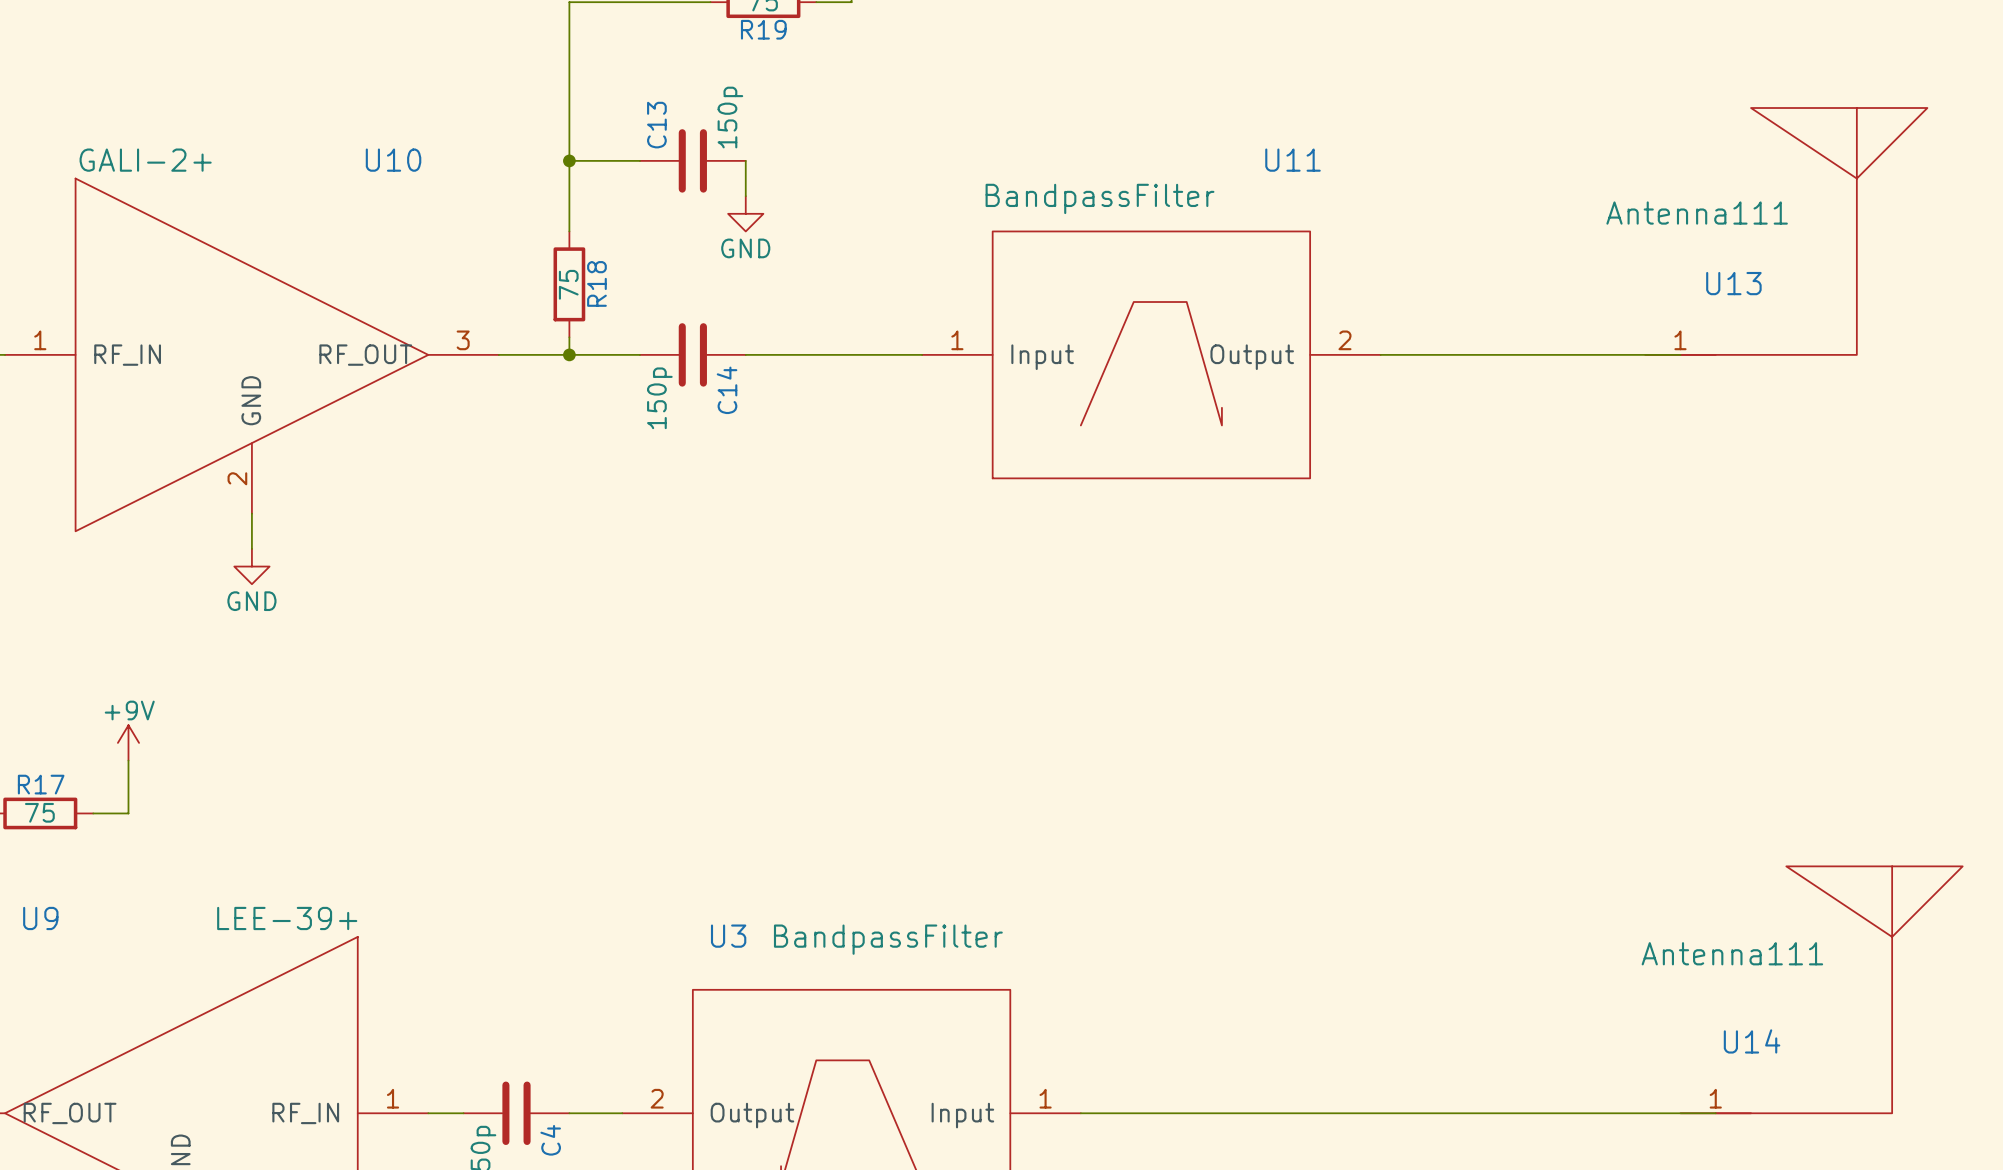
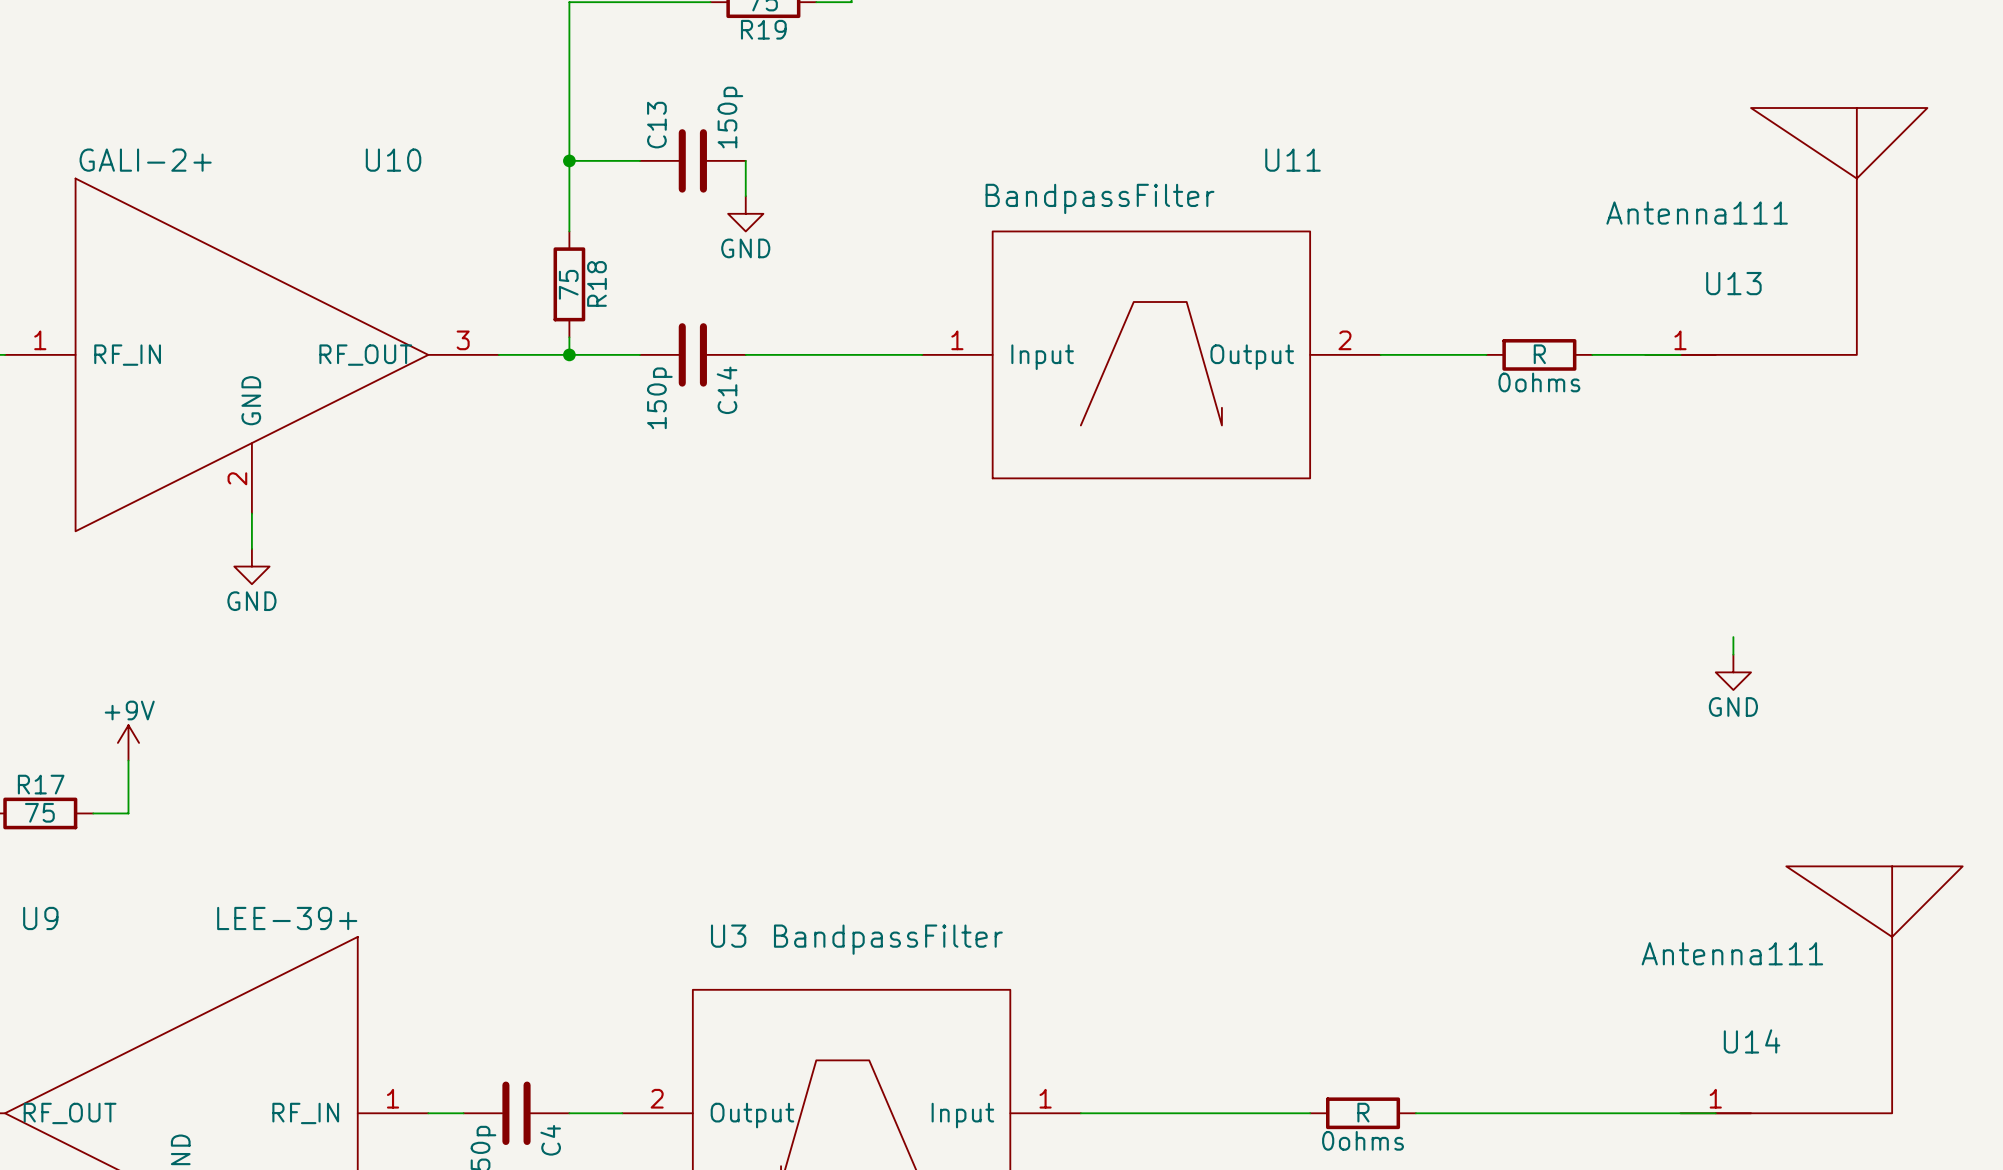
wire: (1486, 354) (1592, 354) -> none
0ohms: none -> R (1539, 354)
wire: none -> (1733, 637) (1733, 654)
power symbol: none -> GND (1733, 672)
wire: (1310, 1113) (1415, 1113) -> none
0ohms: none -> R (1363, 1113)

